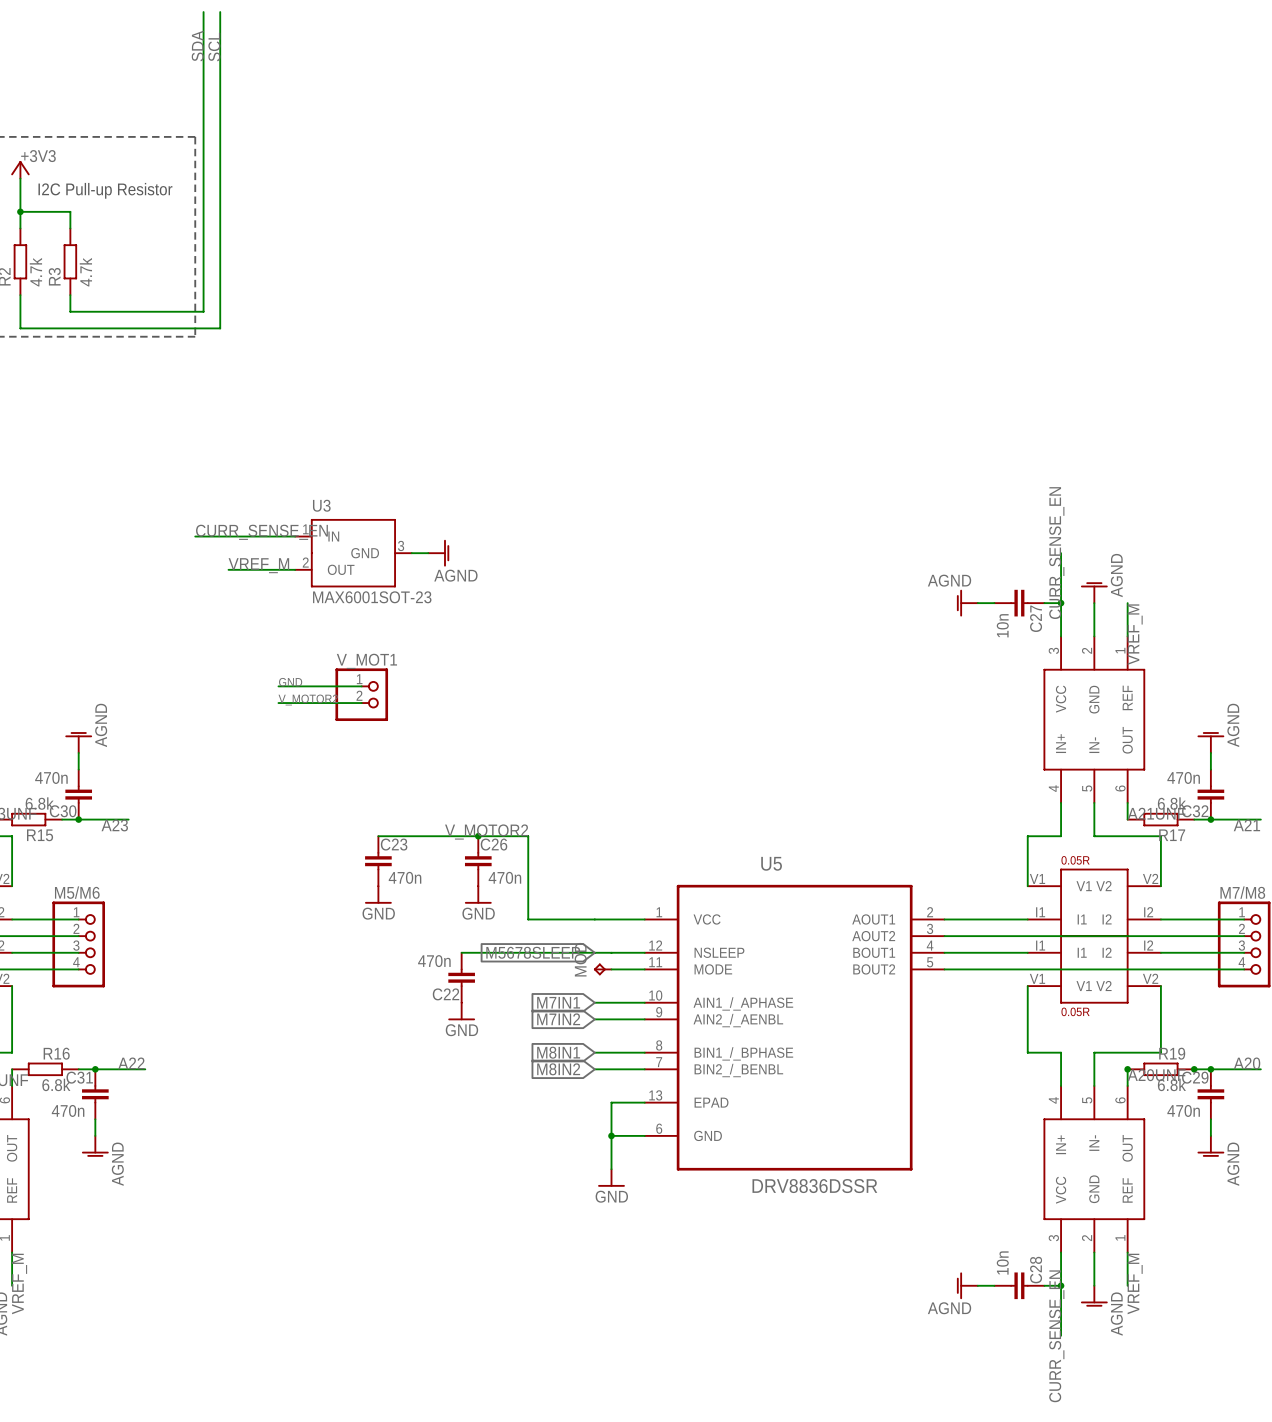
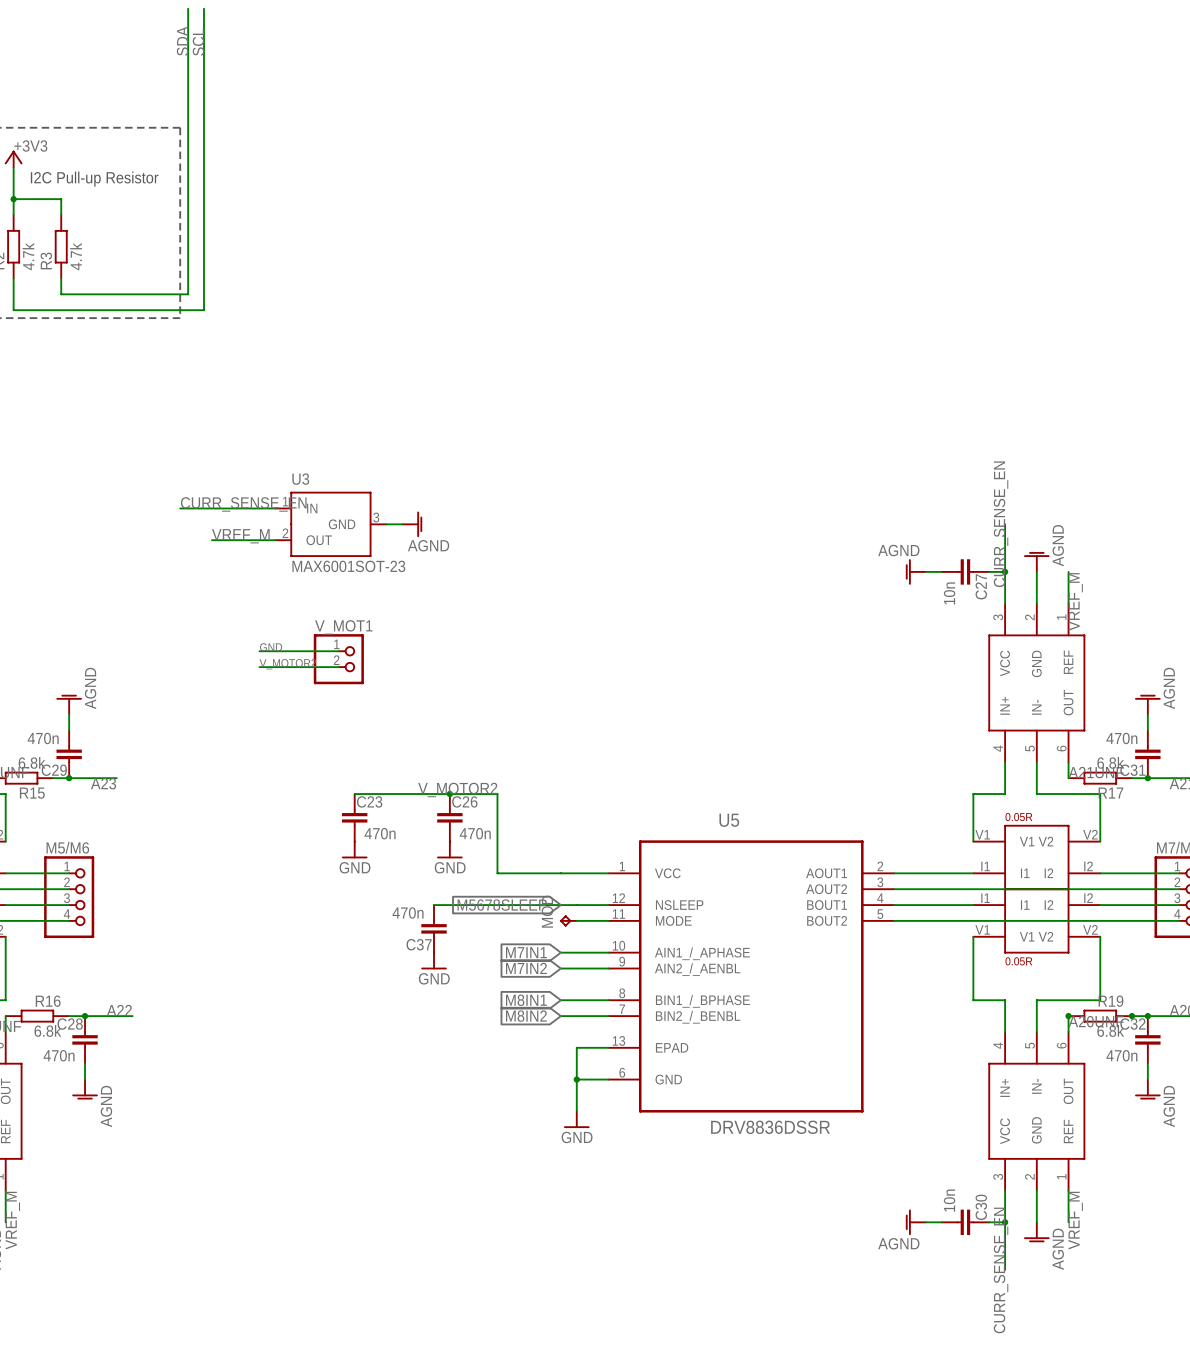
C30 name: C30 (63, 811) -> C29 (54, 770)
C32 name: C32 (1195, 811) -> C31 (1132, 770)
C22 name: C22 (446, 994) -> C37 (419, 944)
C31 name: C31 (79, 1077) -> C28 (70, 1024)
C29 name: C29 (1195, 1077) -> C32 (1132, 1024)
C28 name: C28 (1036, 1270) -> C30 (981, 1207)

